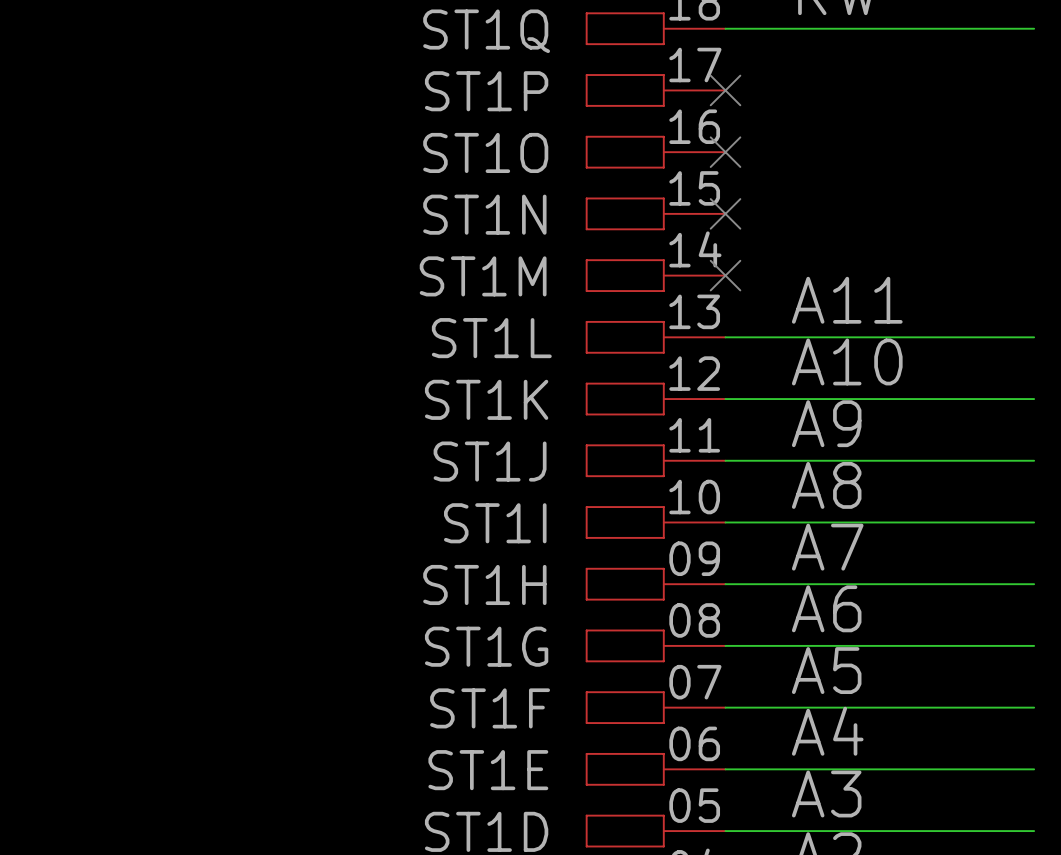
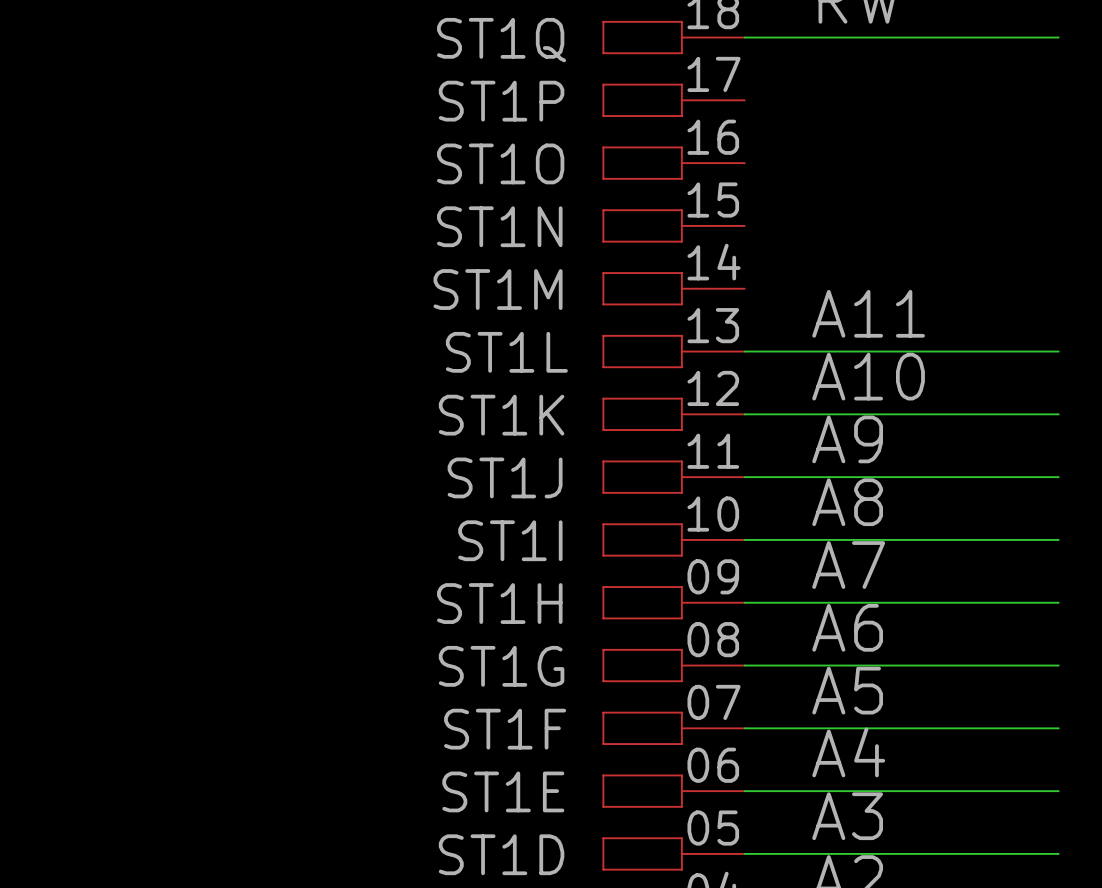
no-connect mark: (725, 90) -> none
no-connect mark: (725, 152) -> none
no-connect mark: (725, 213) -> none
no-connect mark: (725, 275) -> none

